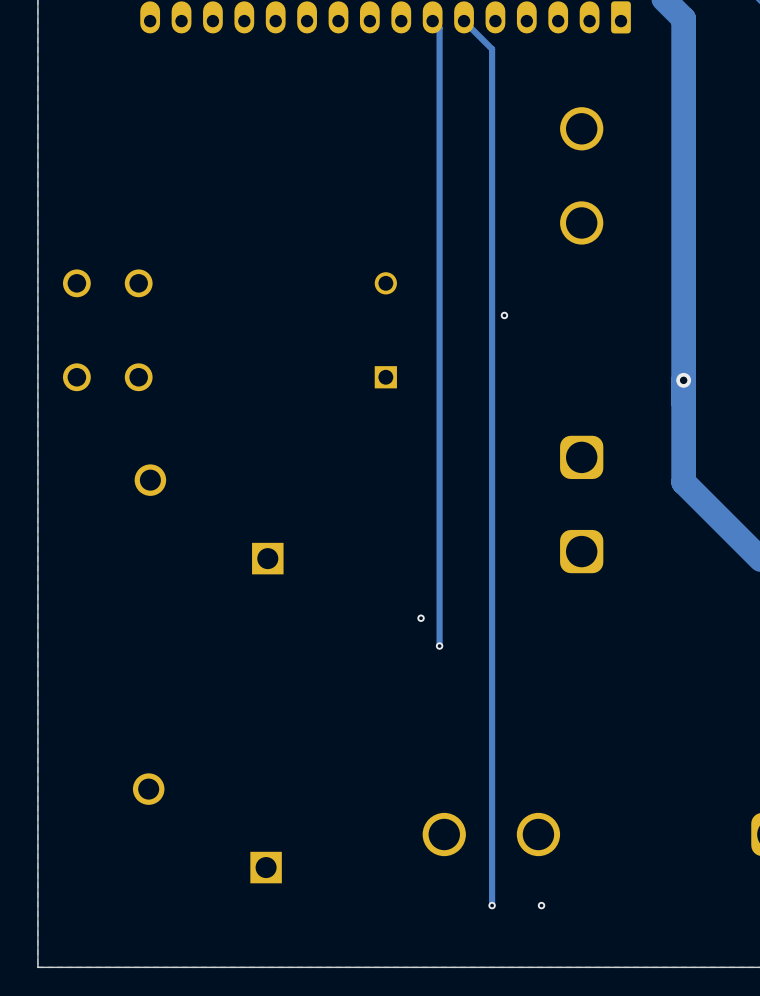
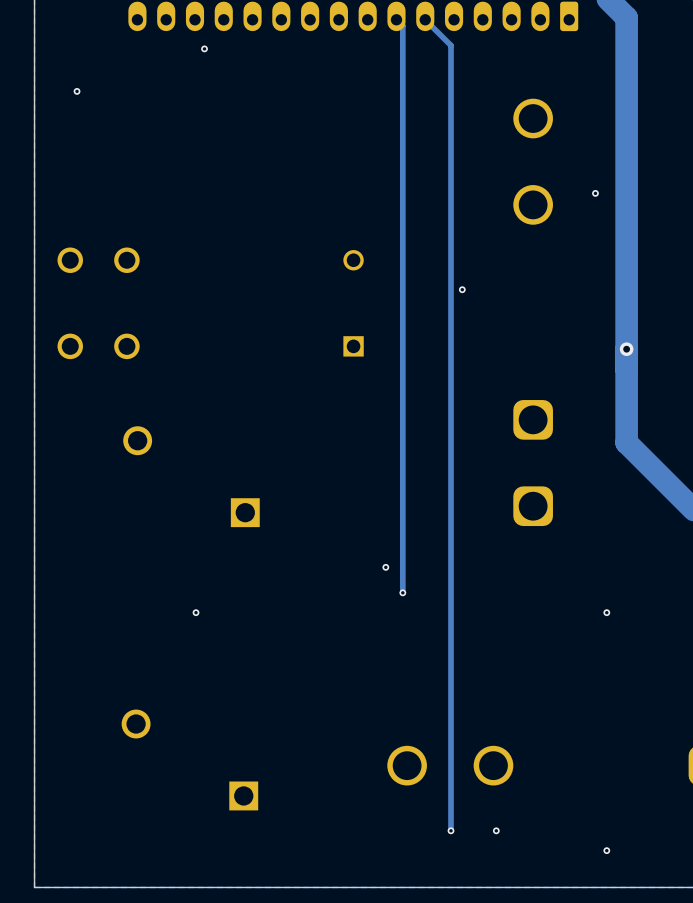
via: none -> (204, 48)
via: none -> (77, 91)
via: none -> (595, 193)
via: none -> (196, 612)
via: none -> (606, 612)
via: none -> (606, 850)

